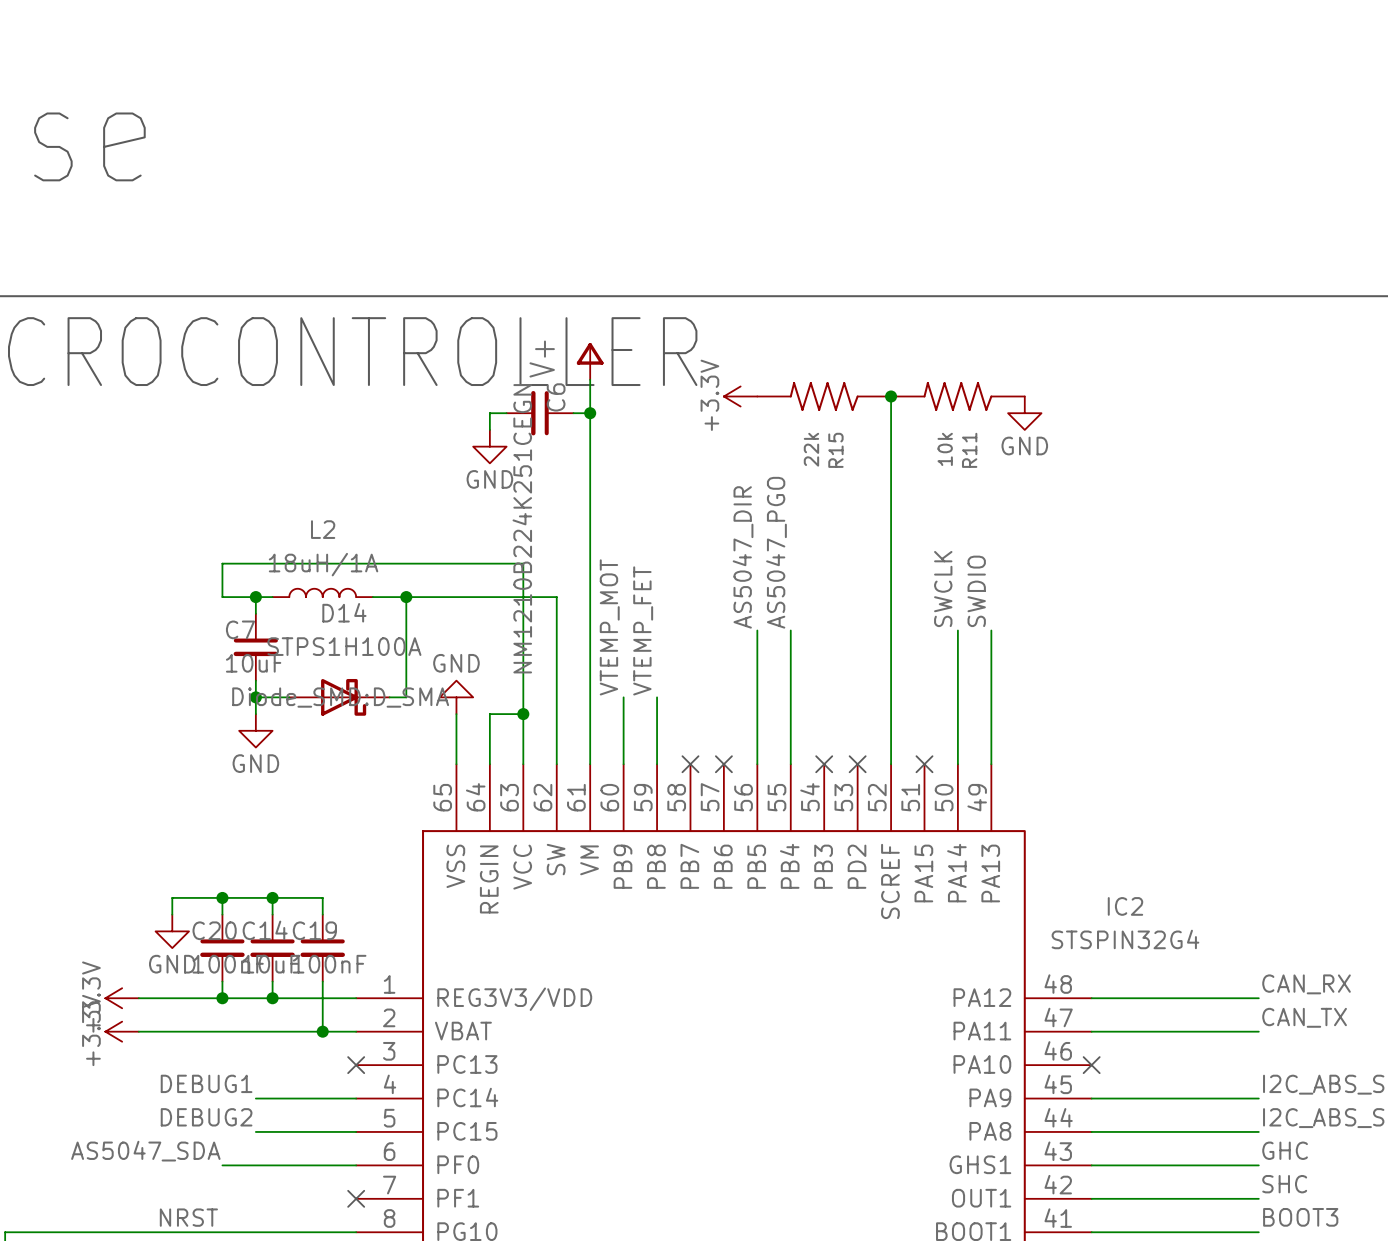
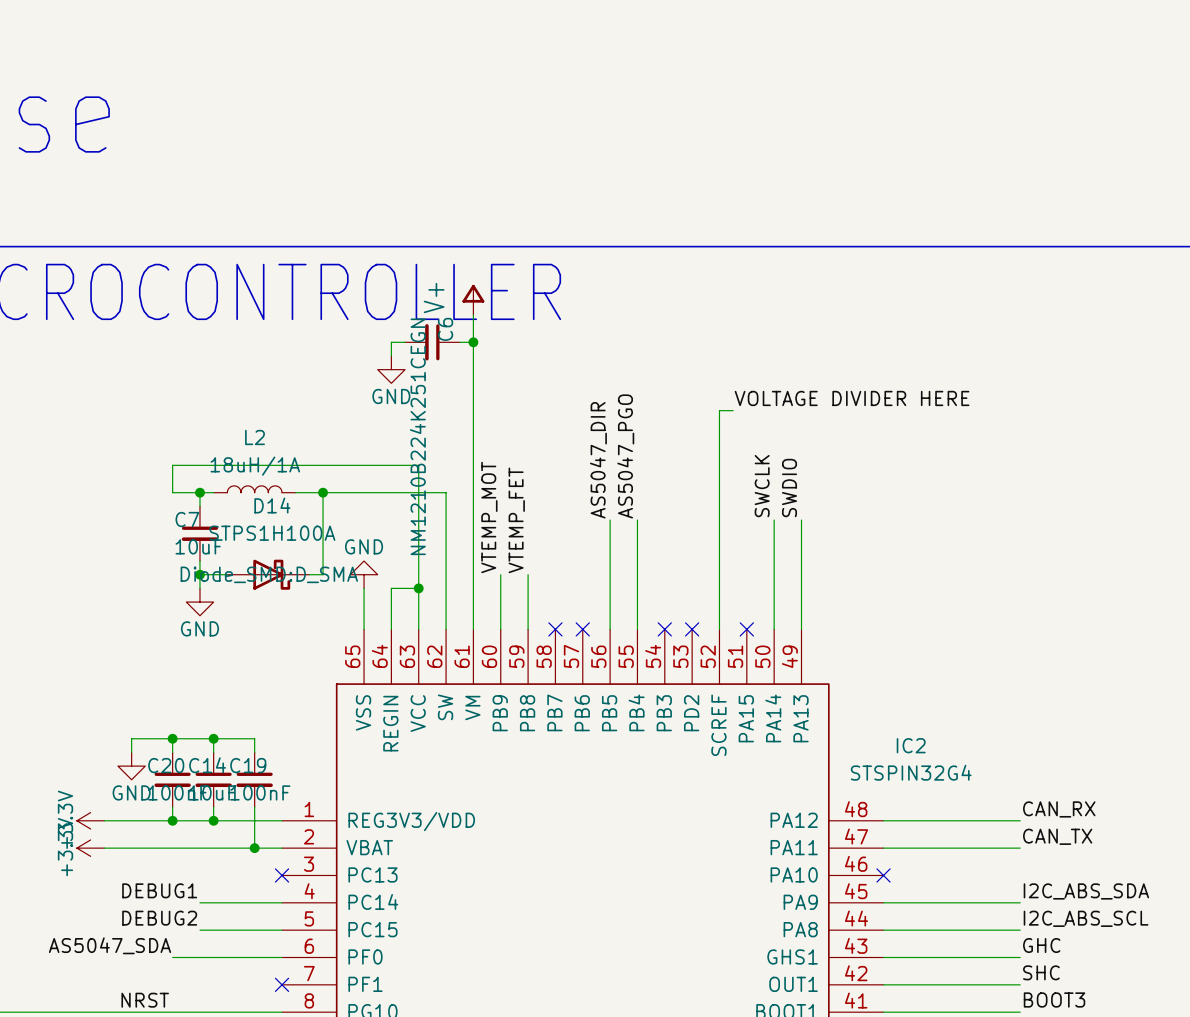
power symbol: +3.3V (740, 396) -> none
R15: 22k (824, 396) -> none
wire: (891, 396) (891, 496) -> (733, 410) (719, 410)
junction: (891, 396) -> none
R11: 10k (957, 396) -> none
power symbol: GND (1024, 413) -> none
label: none -> VOLTAGE DIVIDER HERE (852, 398)

